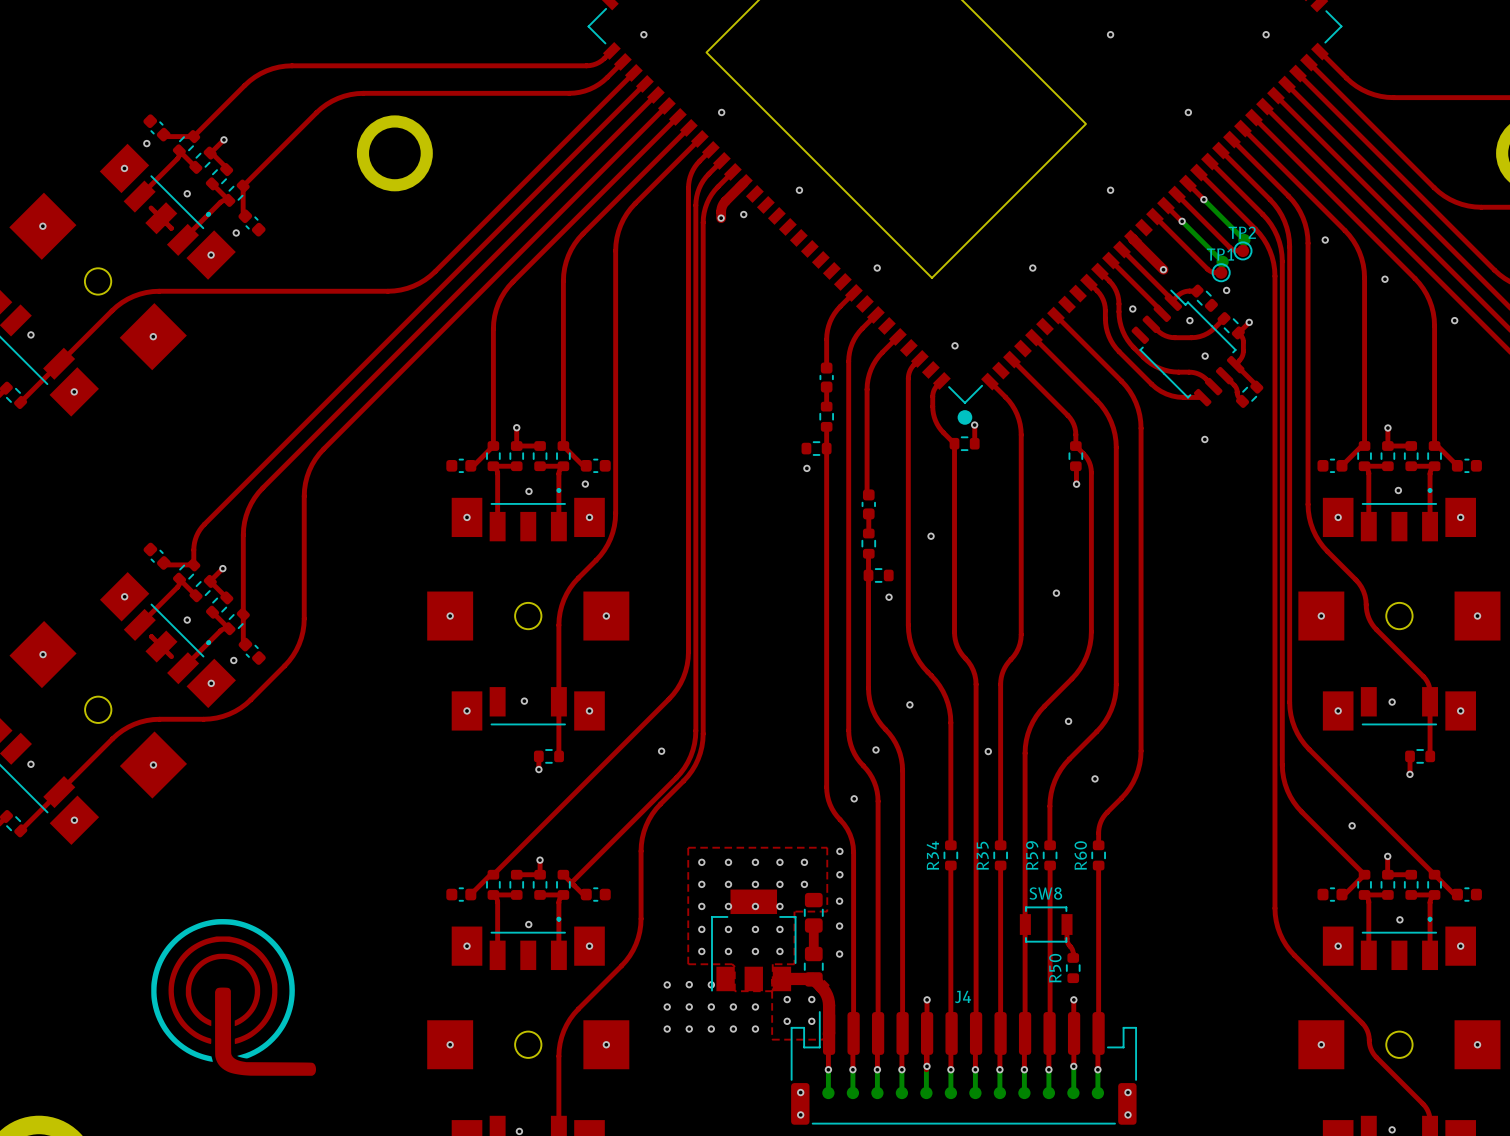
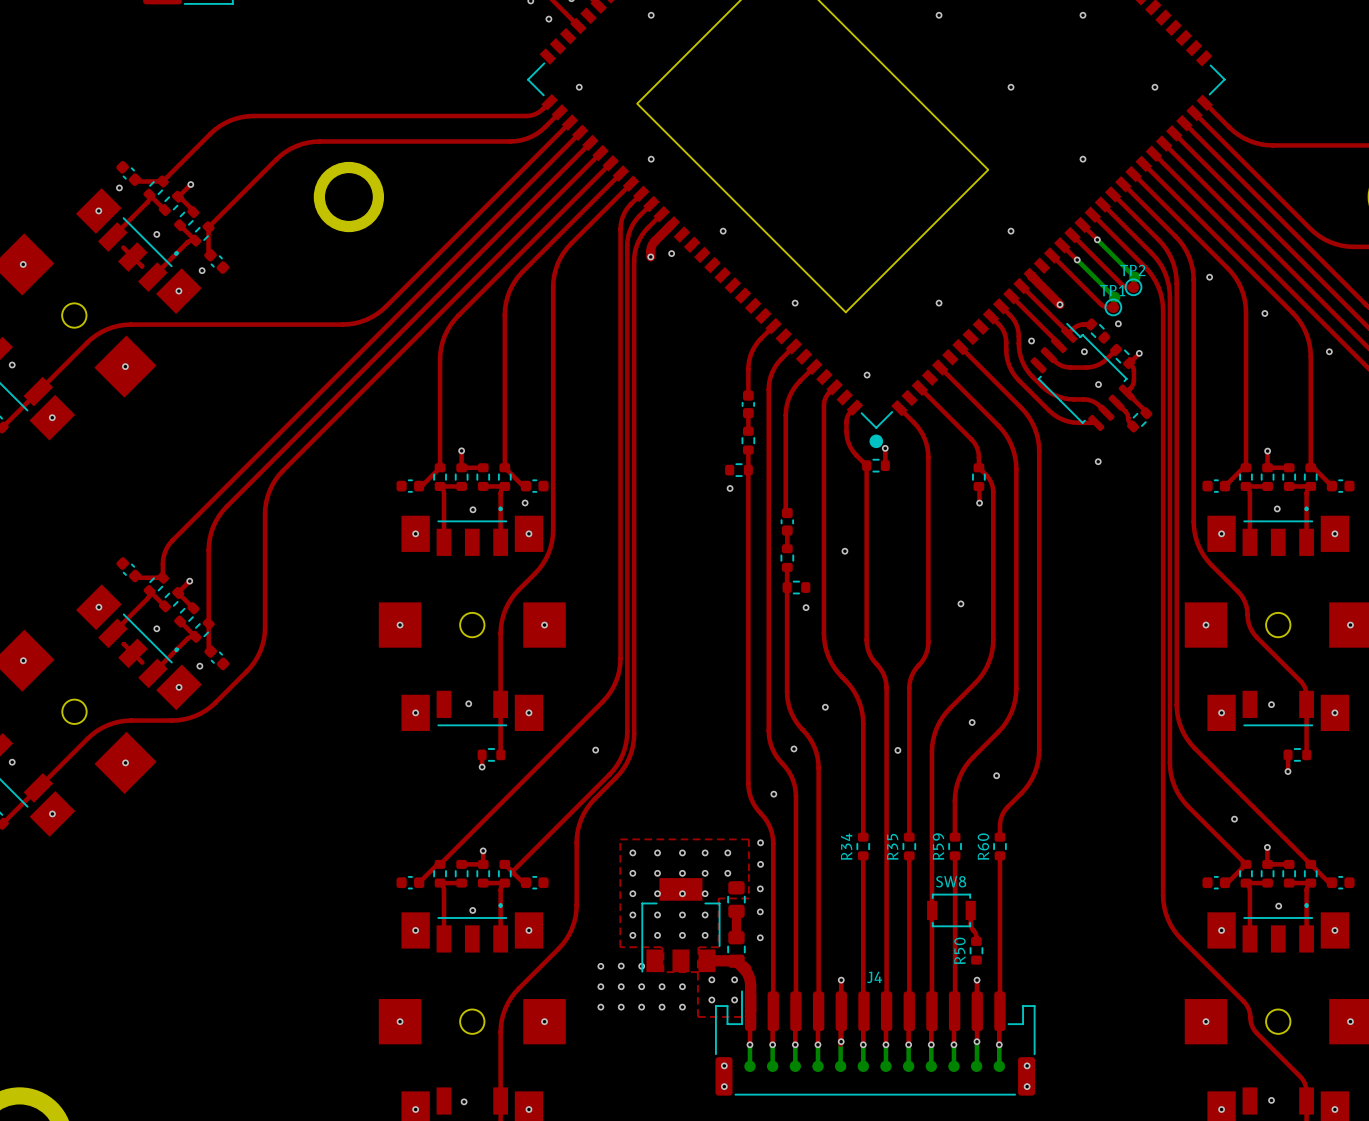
drawing: [151, 919, 317, 1076] -> none

